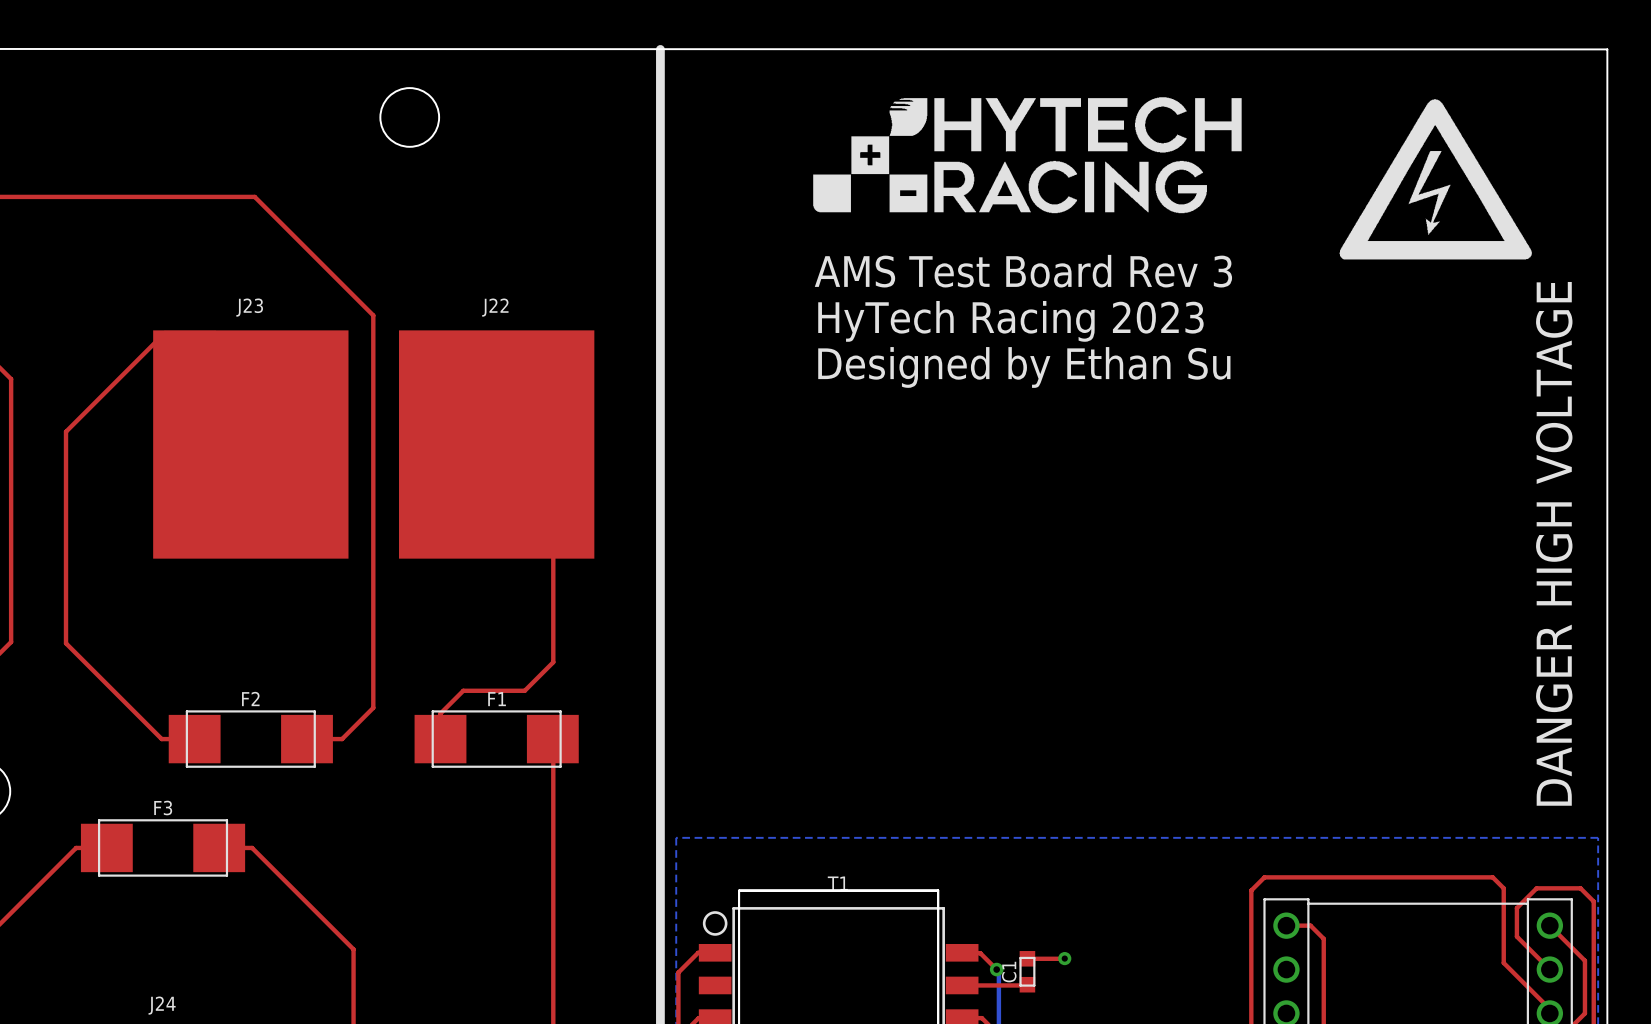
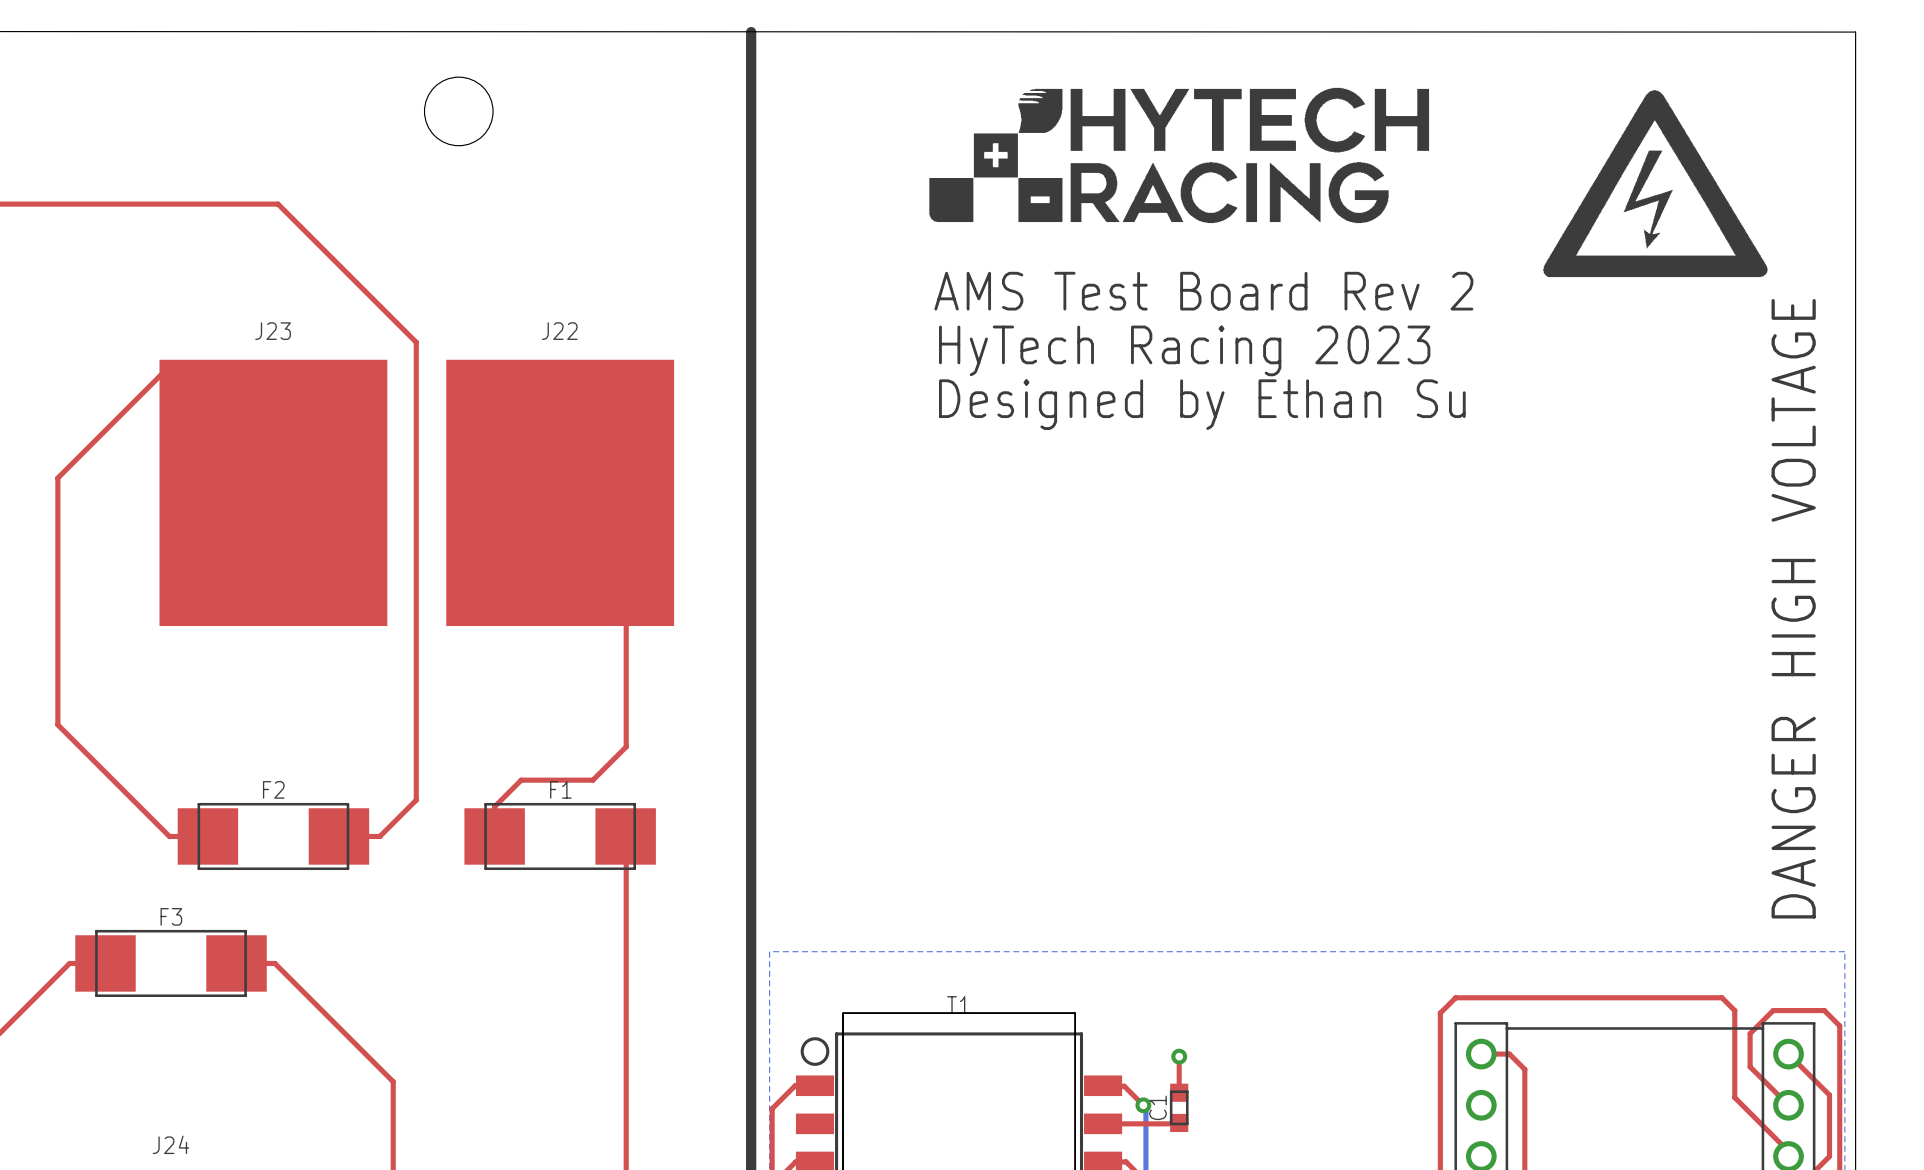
text: AMS Test Board Rev 3 (1023, 271) -> AMS Test Board Rev 2 (1203, 291)
via: none -> (1179, 1056)
top track: (1027, 958) (1064, 958) -> (1179, 1092) (1179, 1056)
via: (1064, 958) -> none

